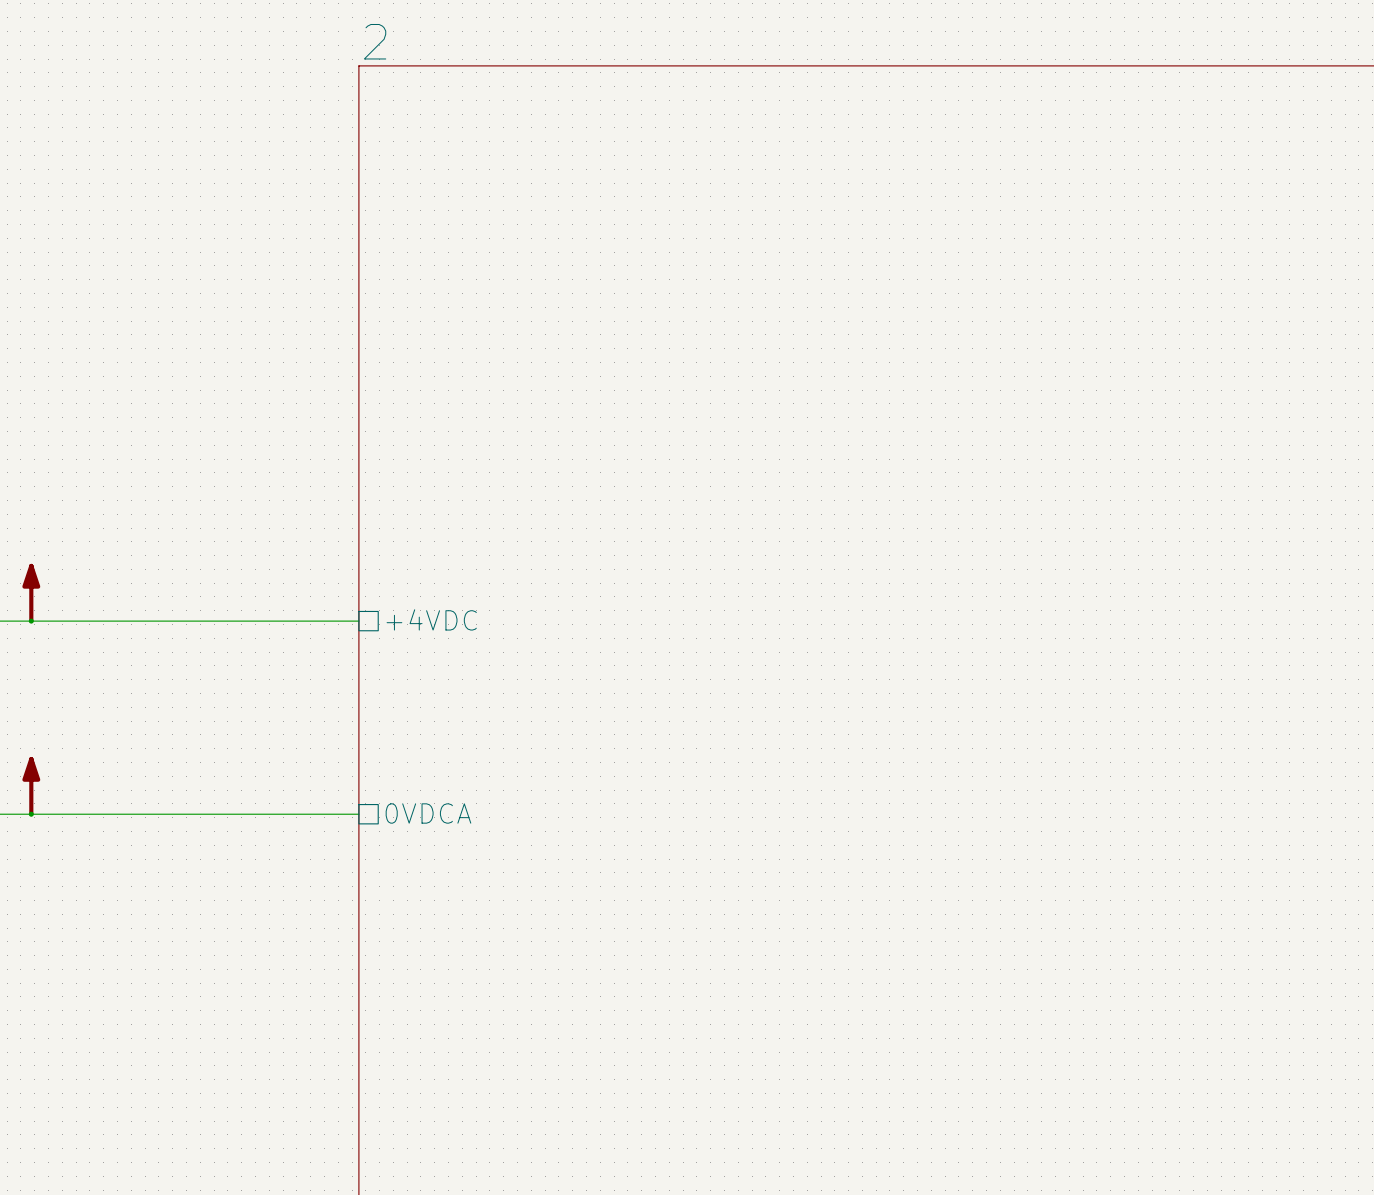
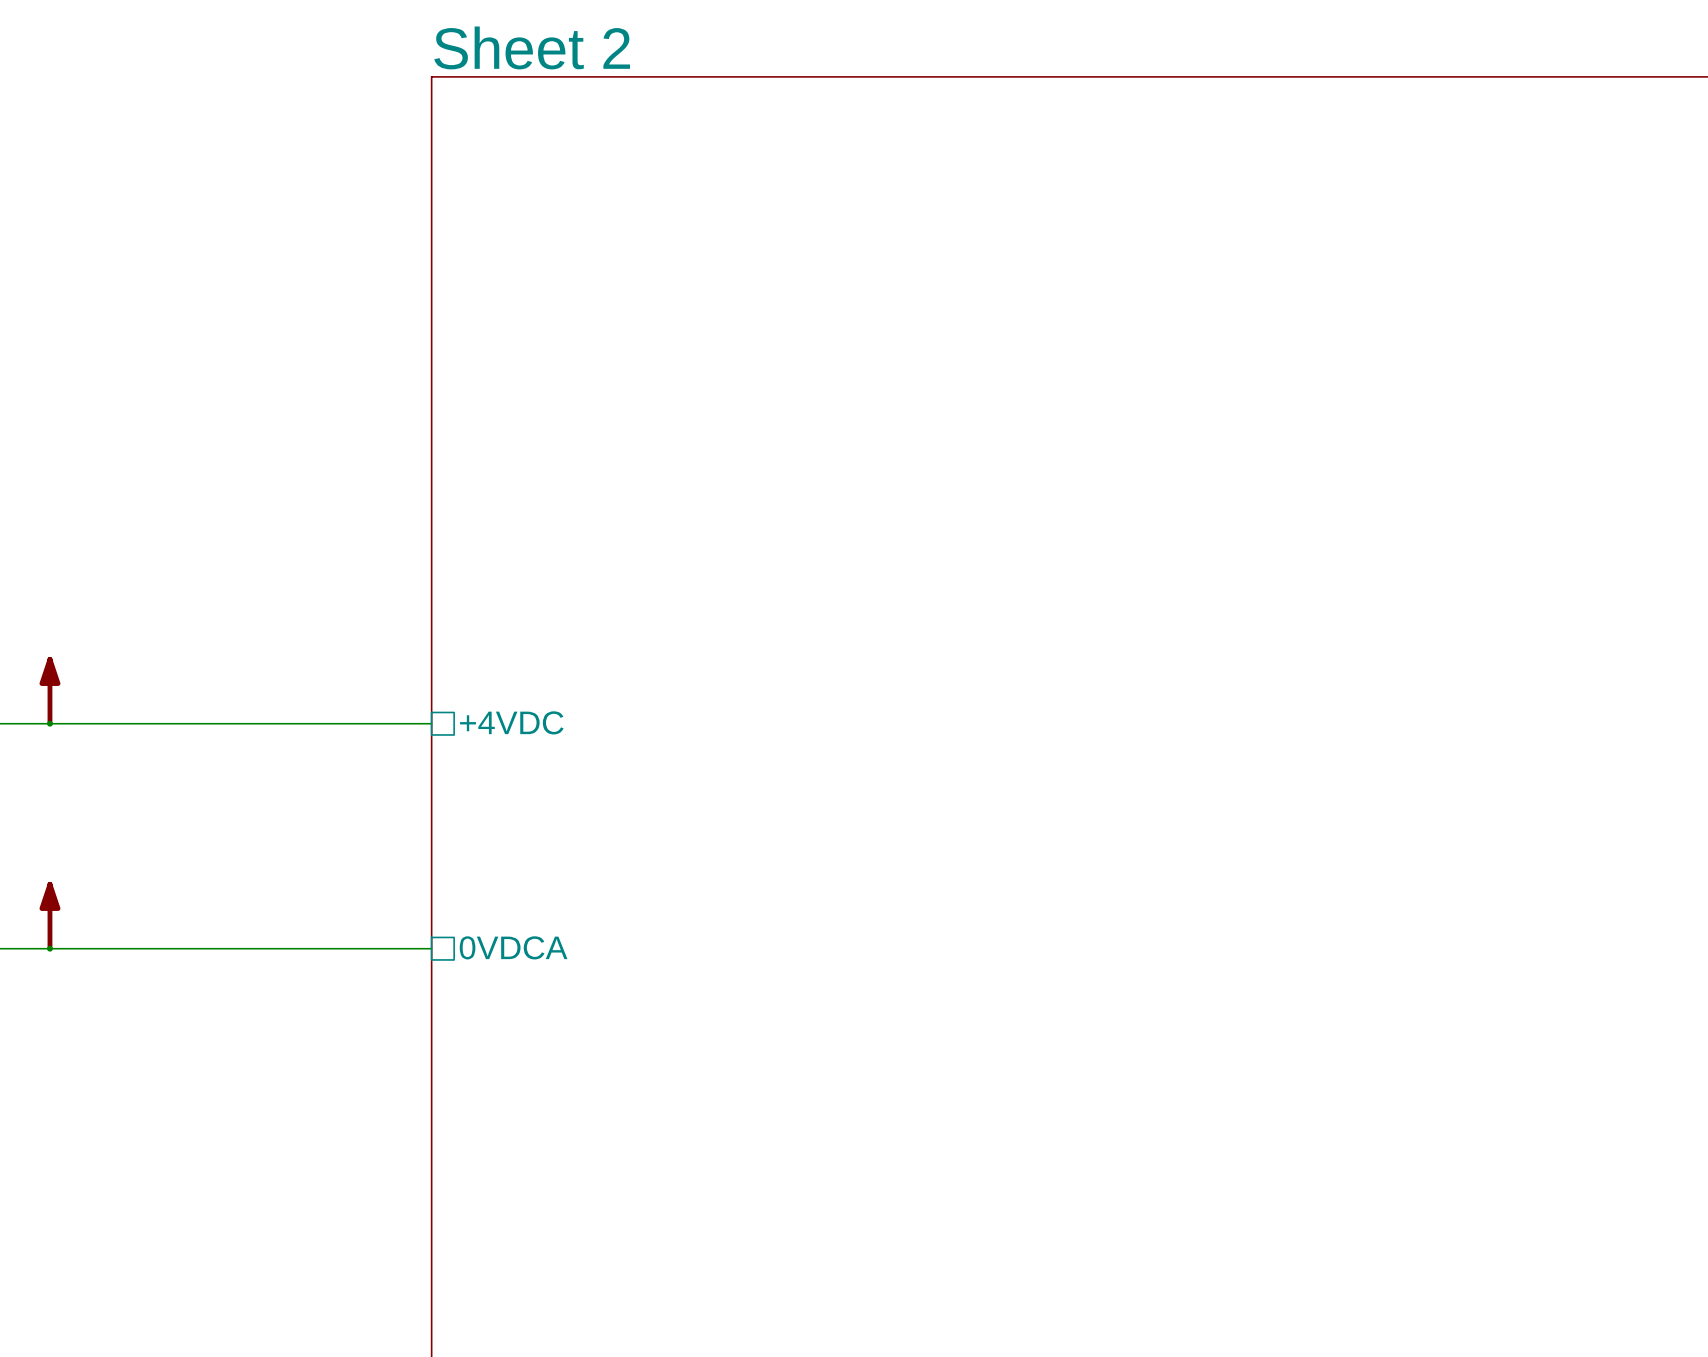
sheet 2 name: 2 (375, 41) -> Sheet 2 (532, 47)

